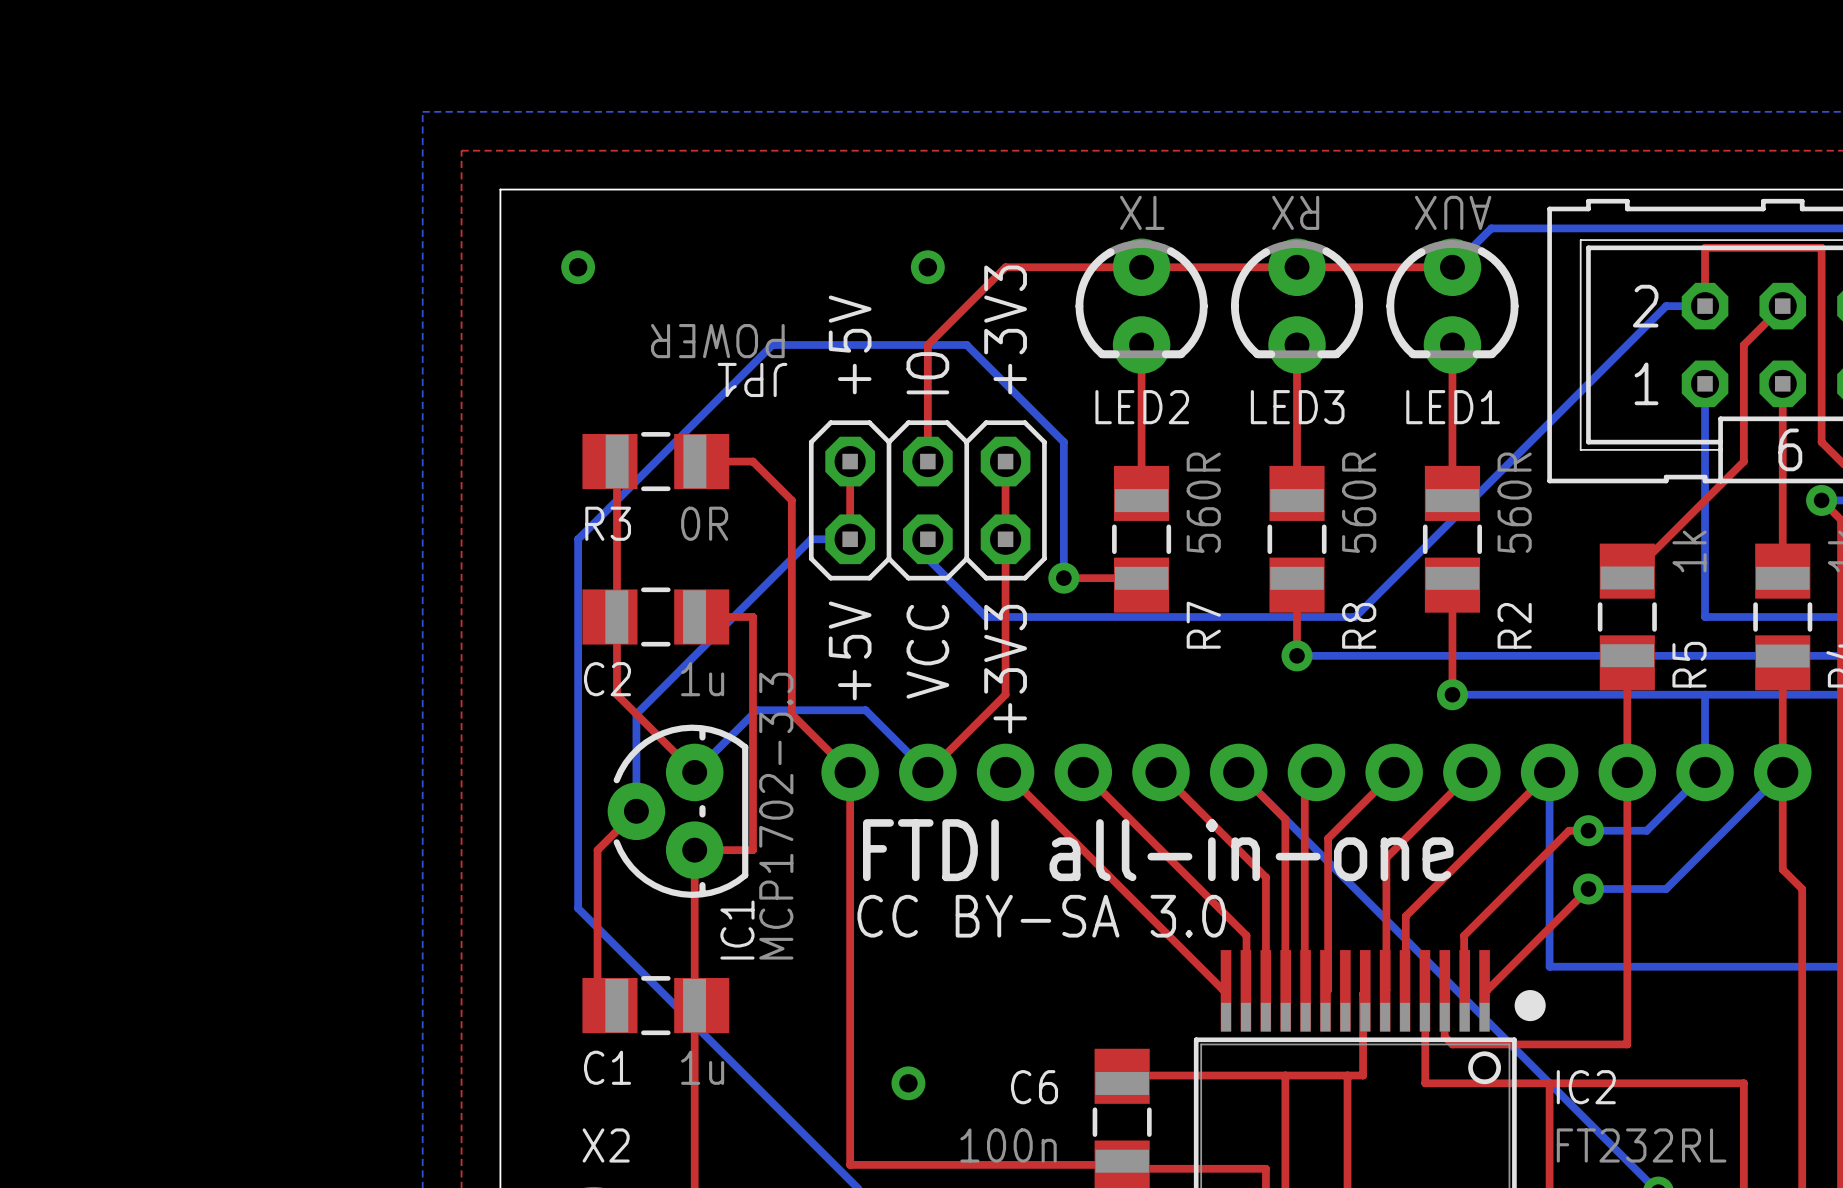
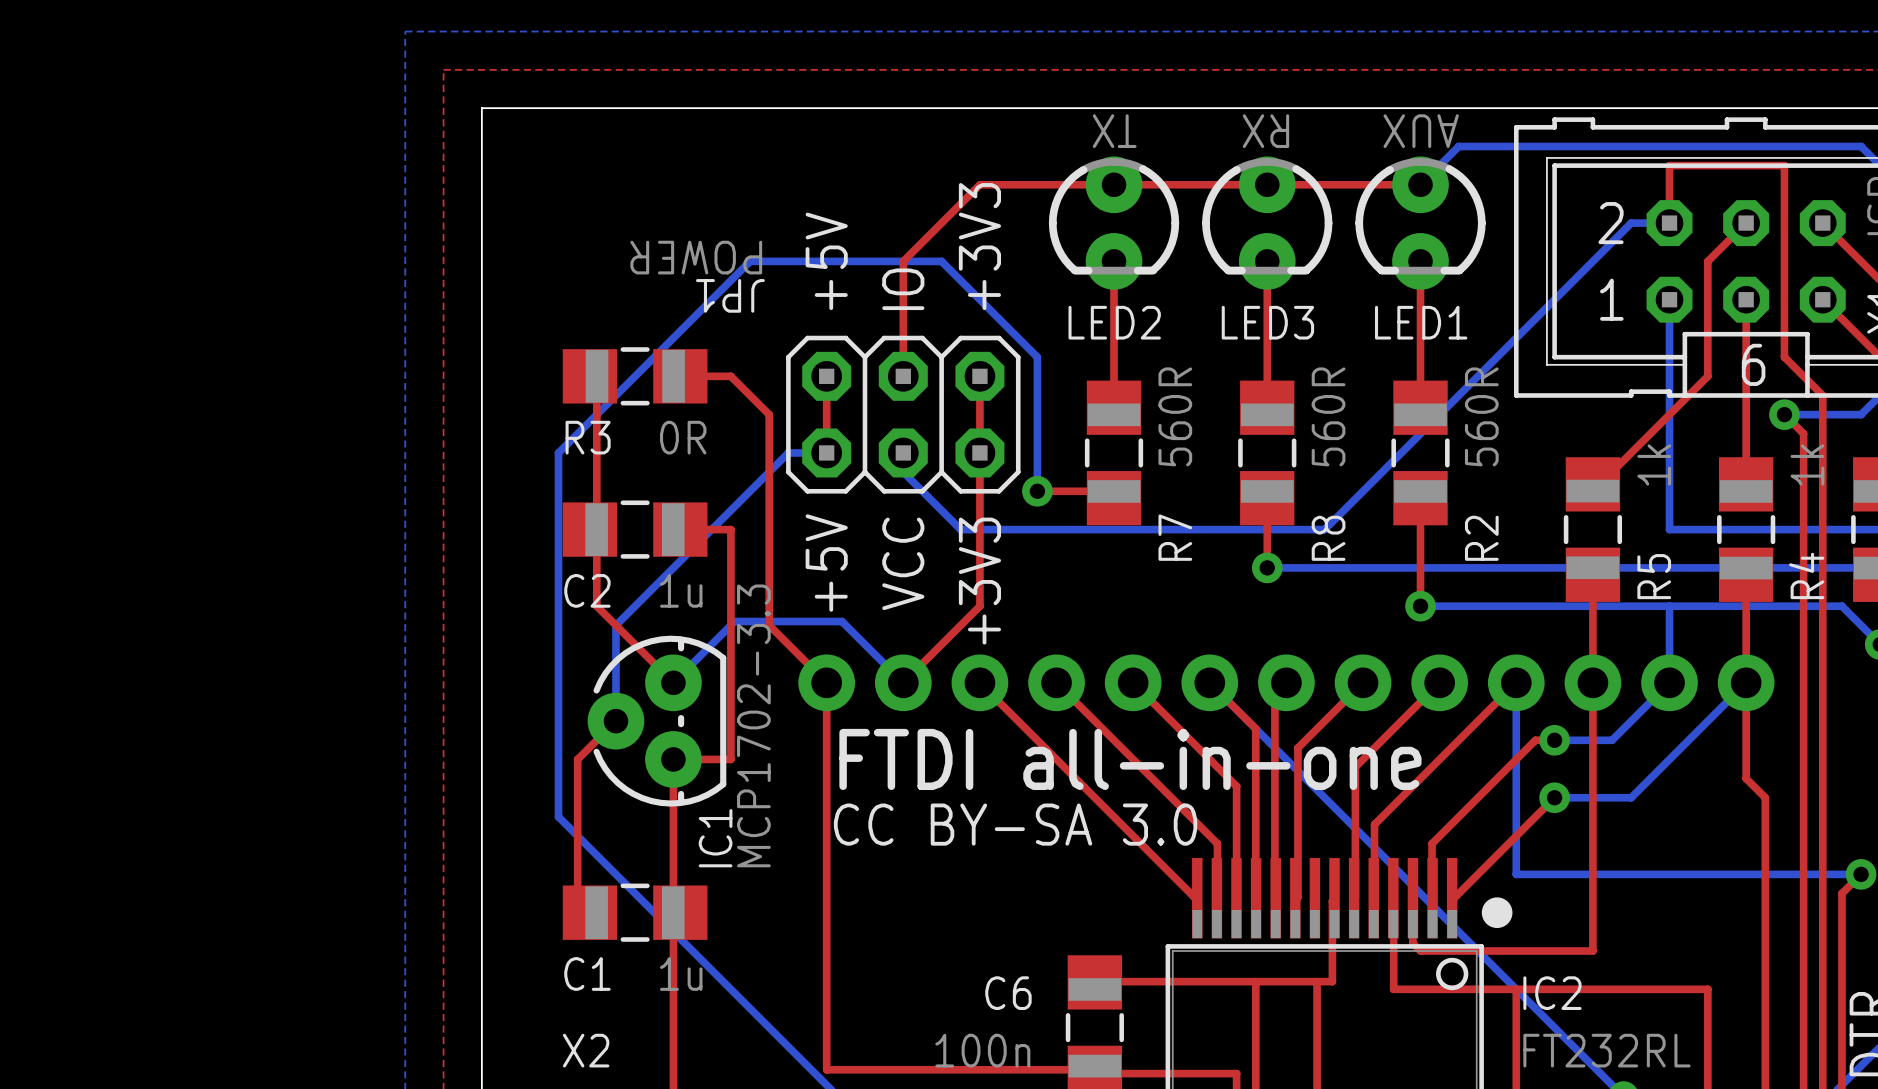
via: (578, 267) -> none
via: (927, 267) -> none
via: (908, 1083) -> none

